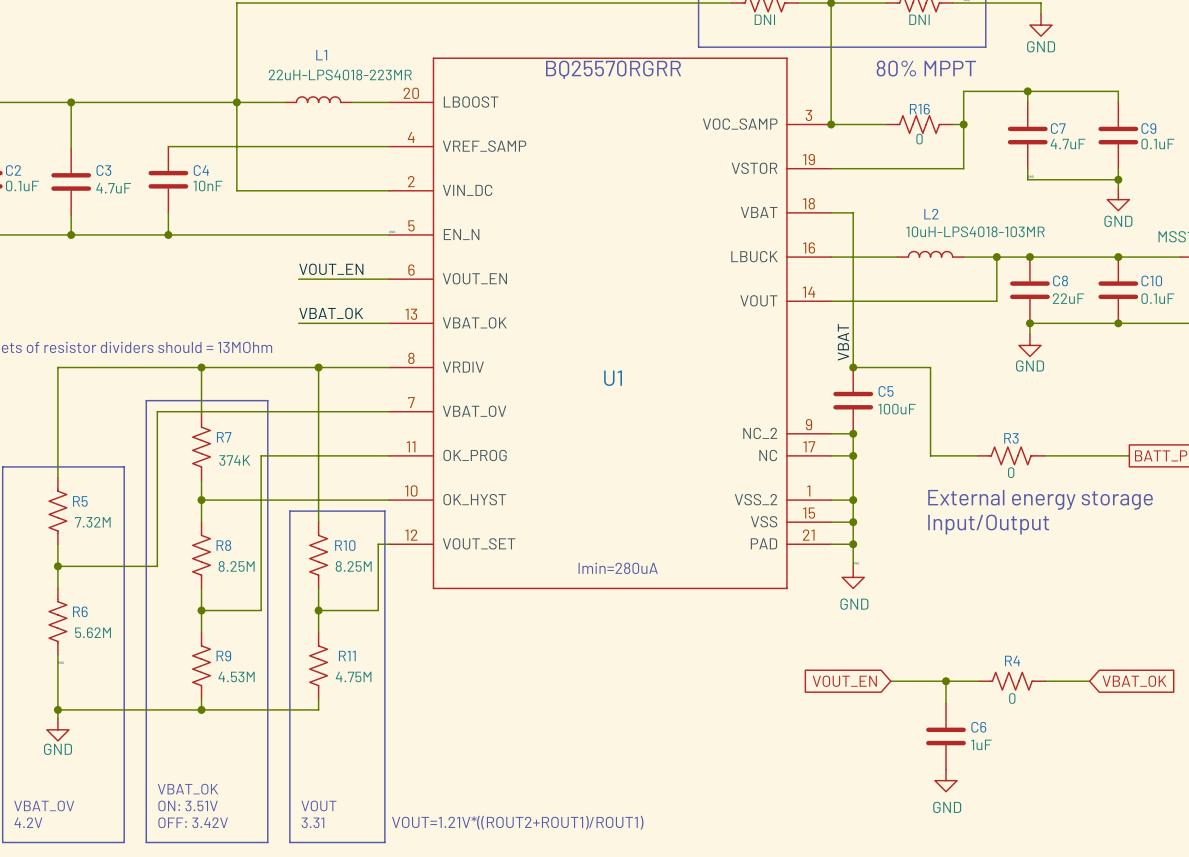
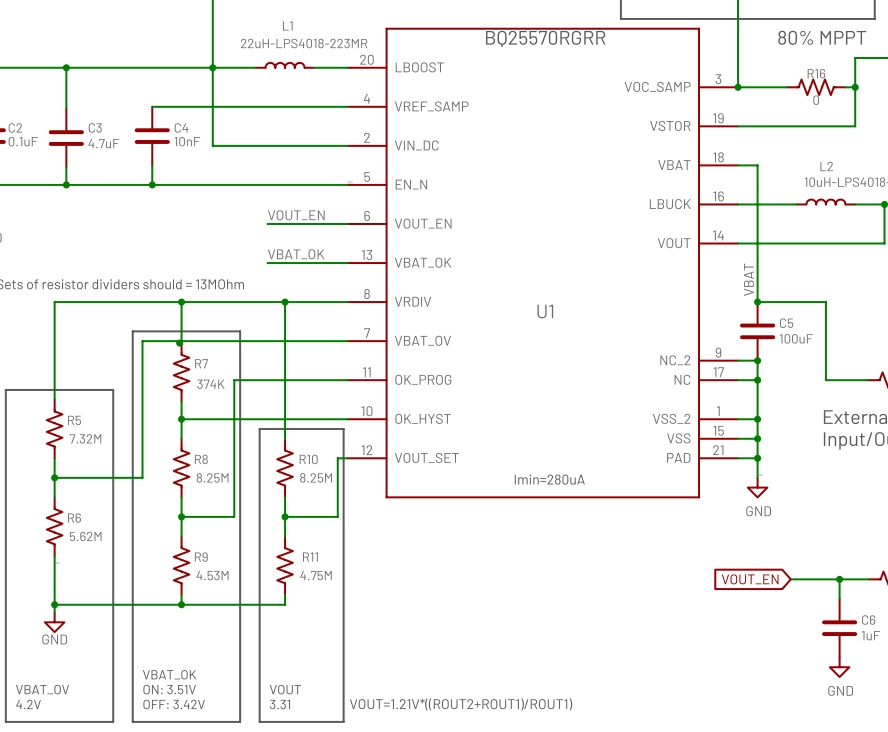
junction: none -> (179, 343)

